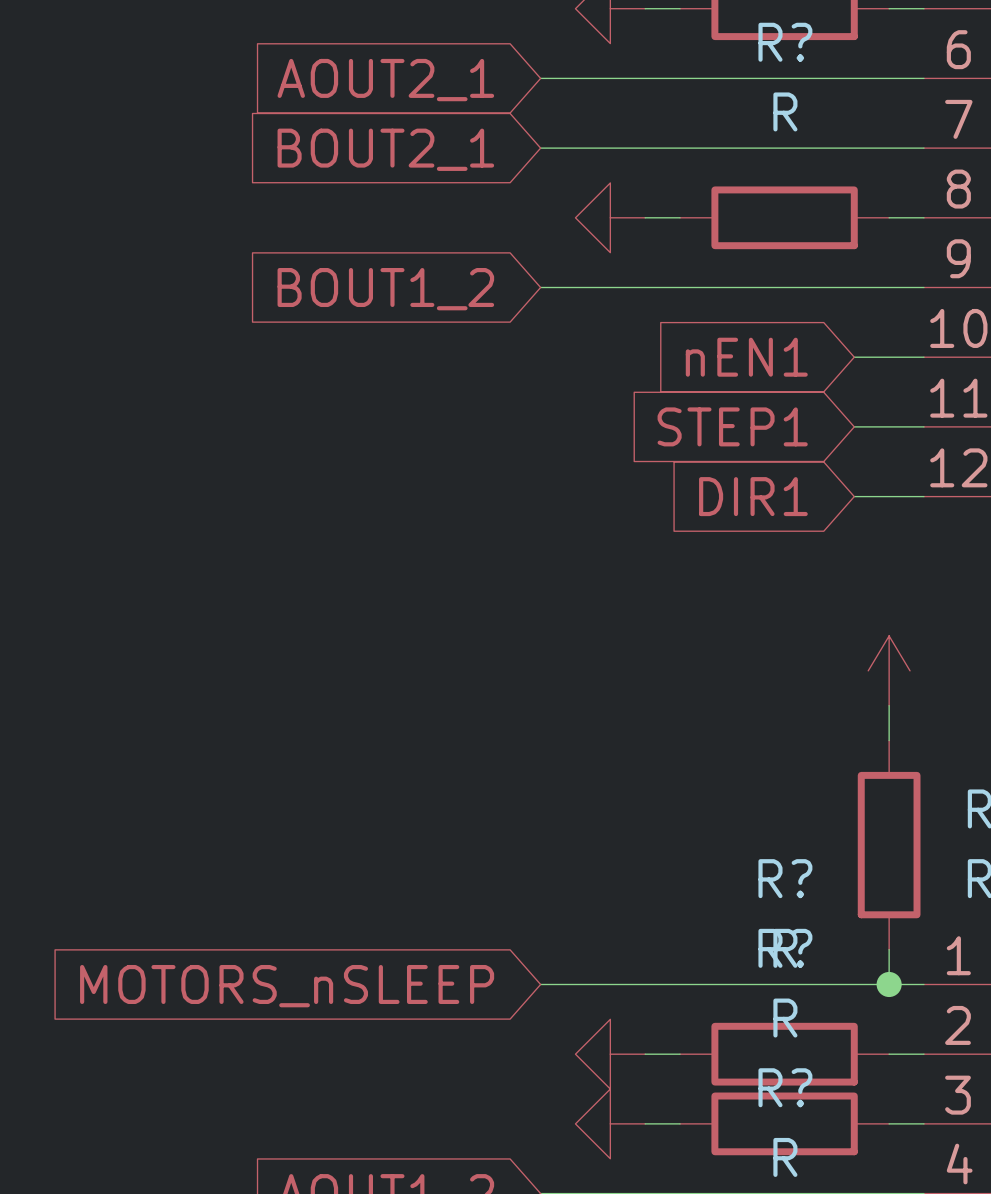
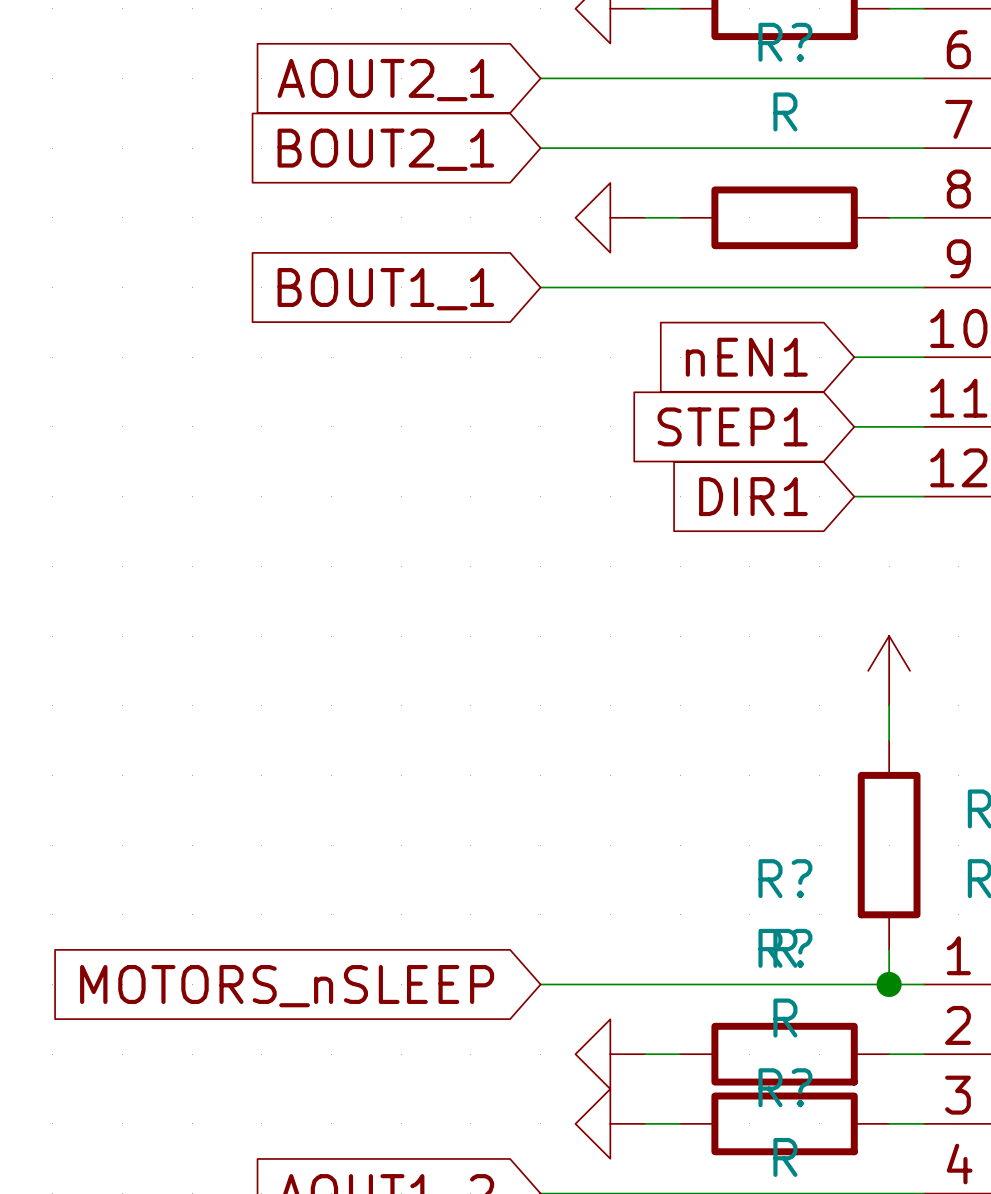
global label: BOUT1_2 (385, 289) -> BOUT1_1 (385, 289)

